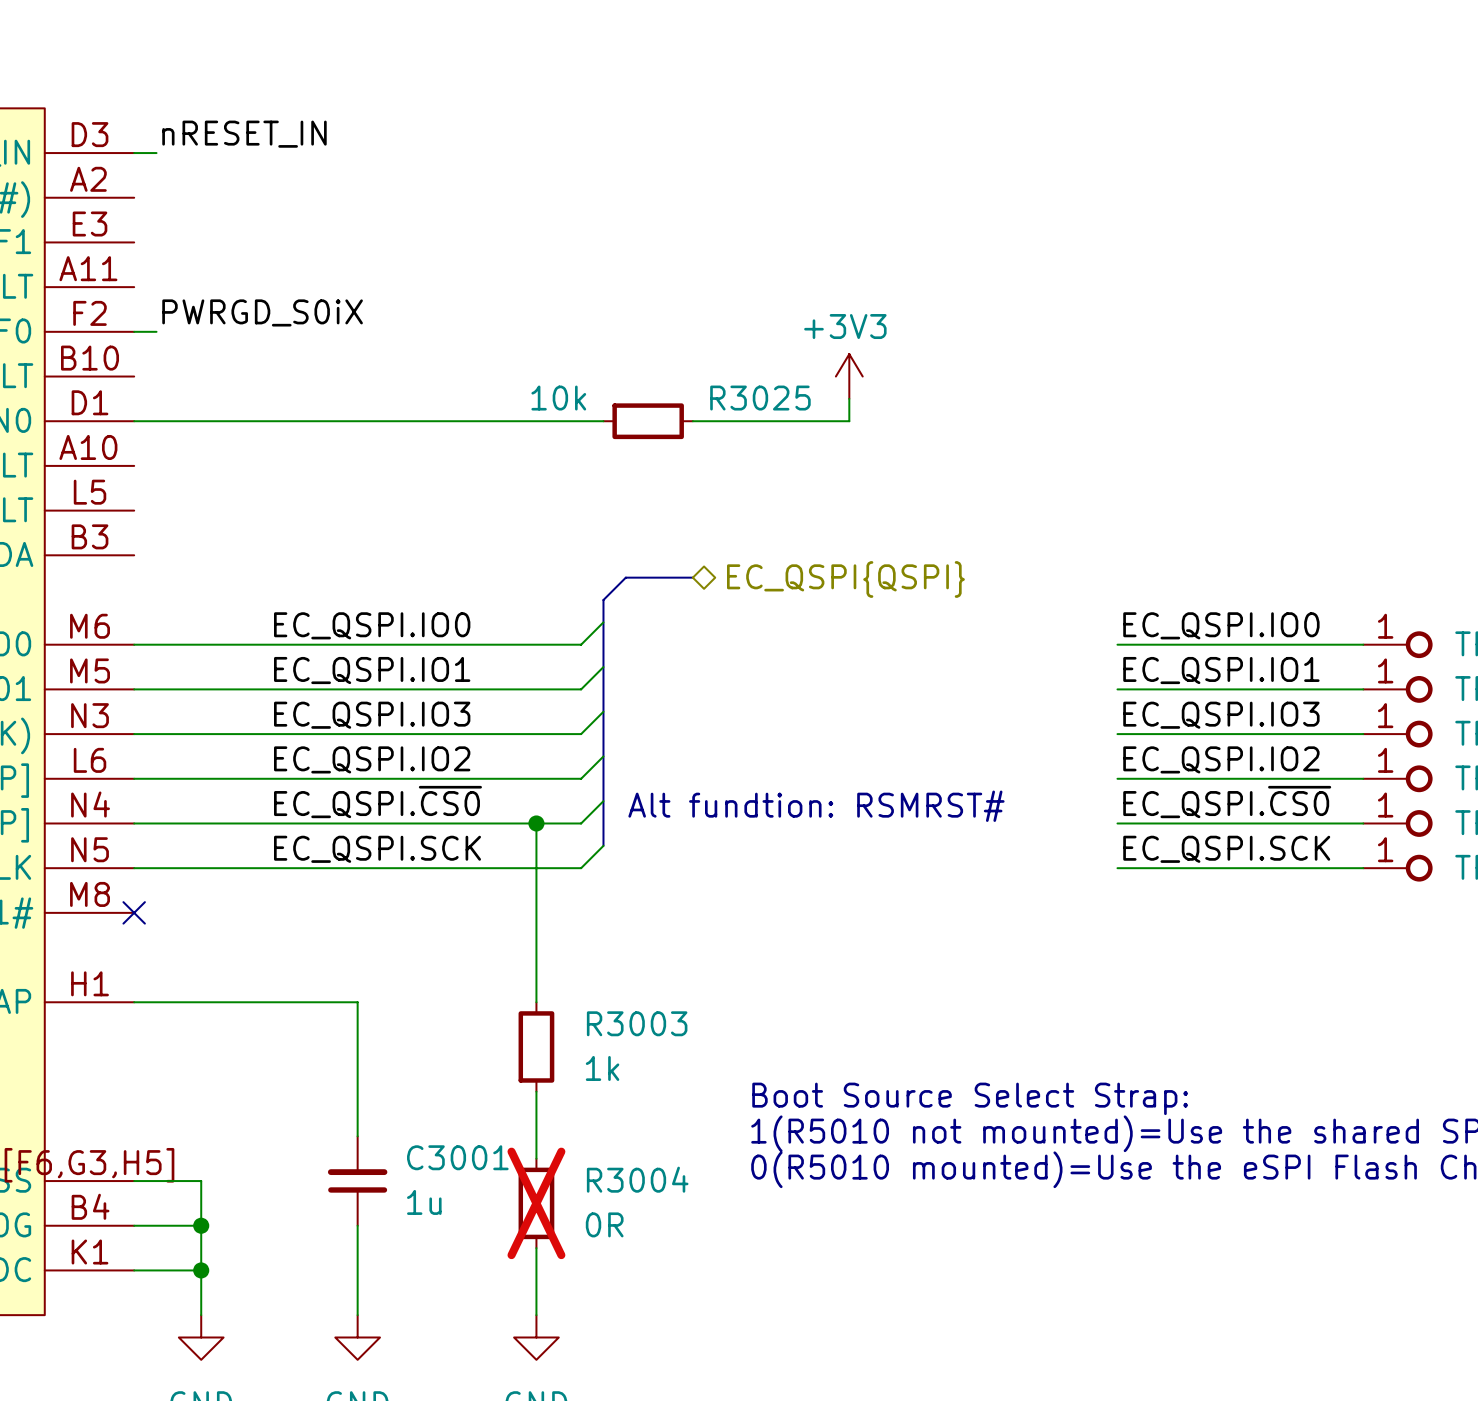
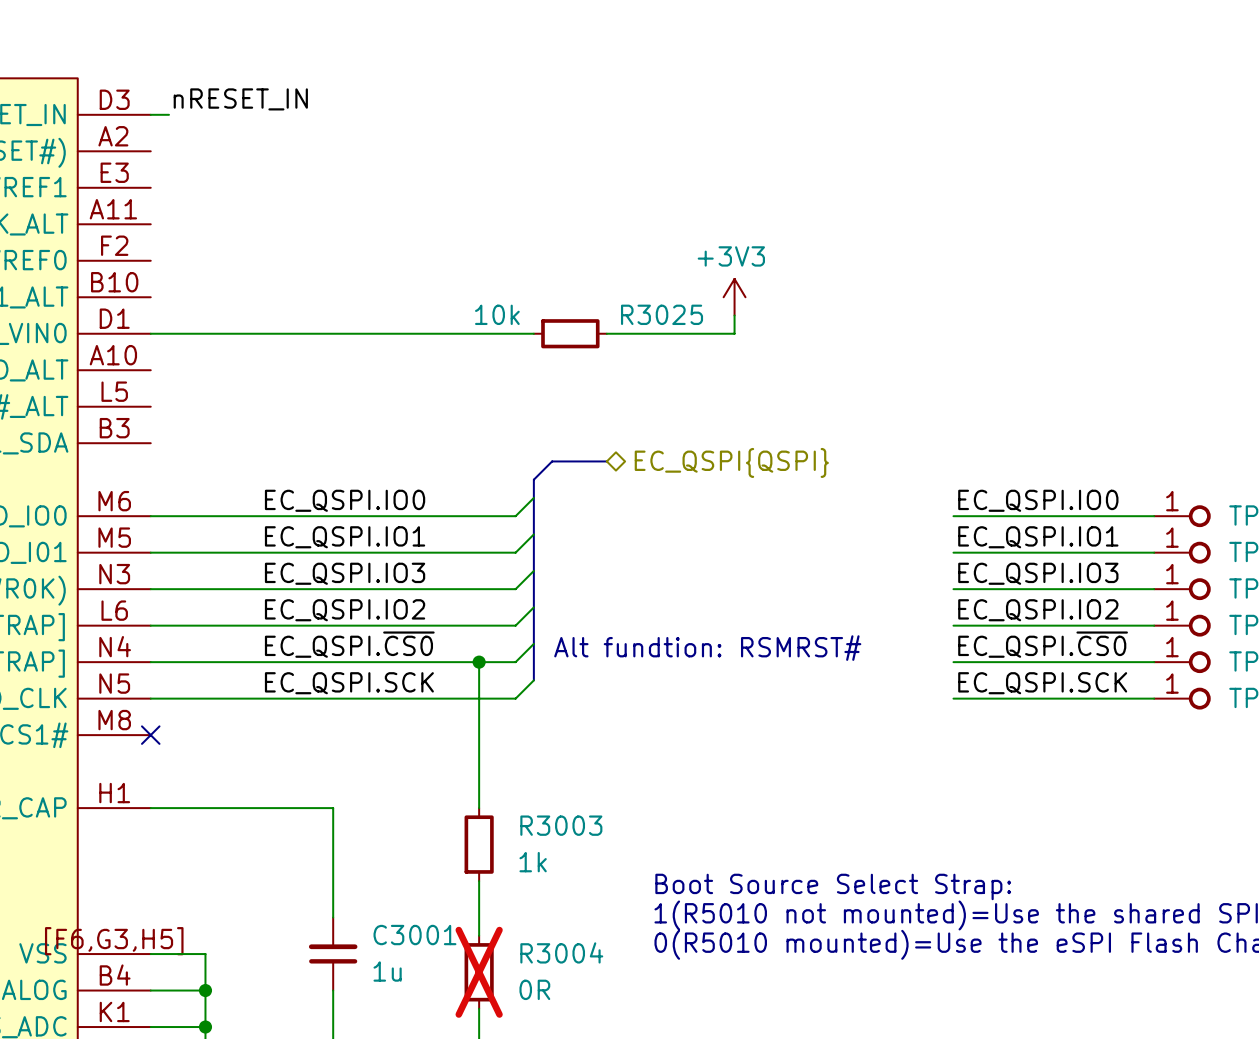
label: PWRGD_S0iX (262, 312) -> none
wire: (134, 331) (156, 331) -> none

